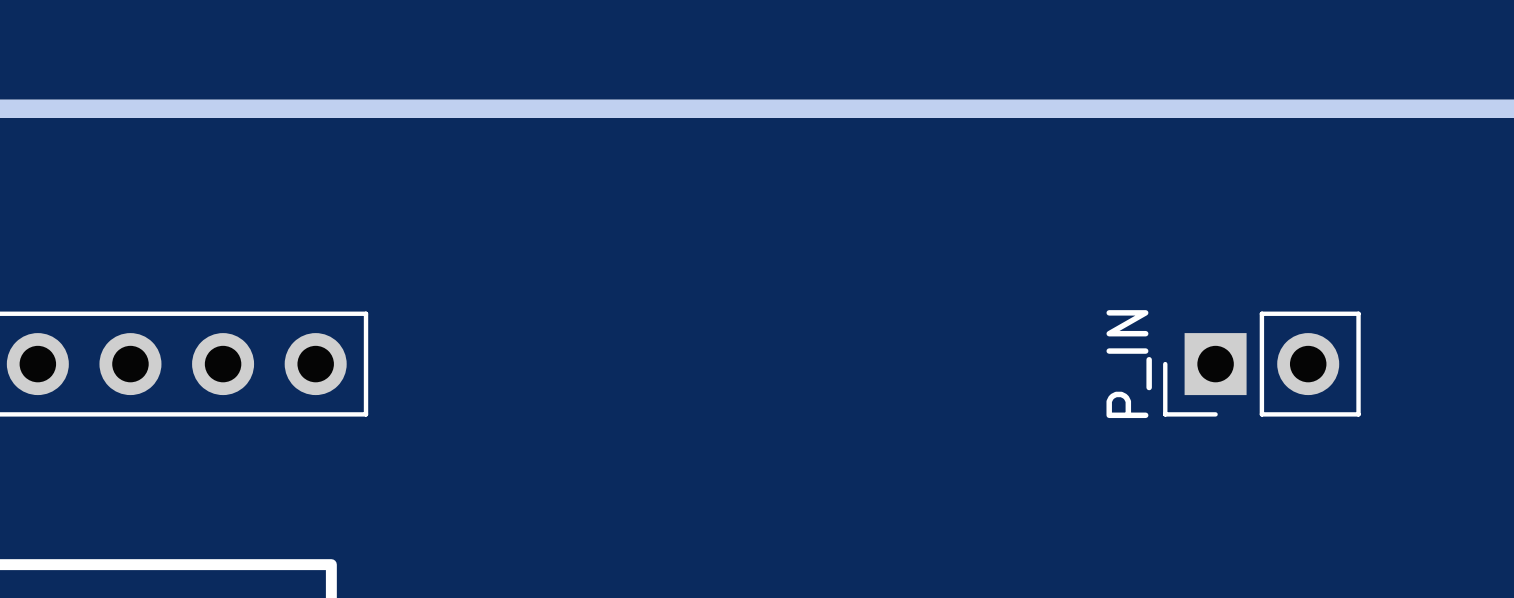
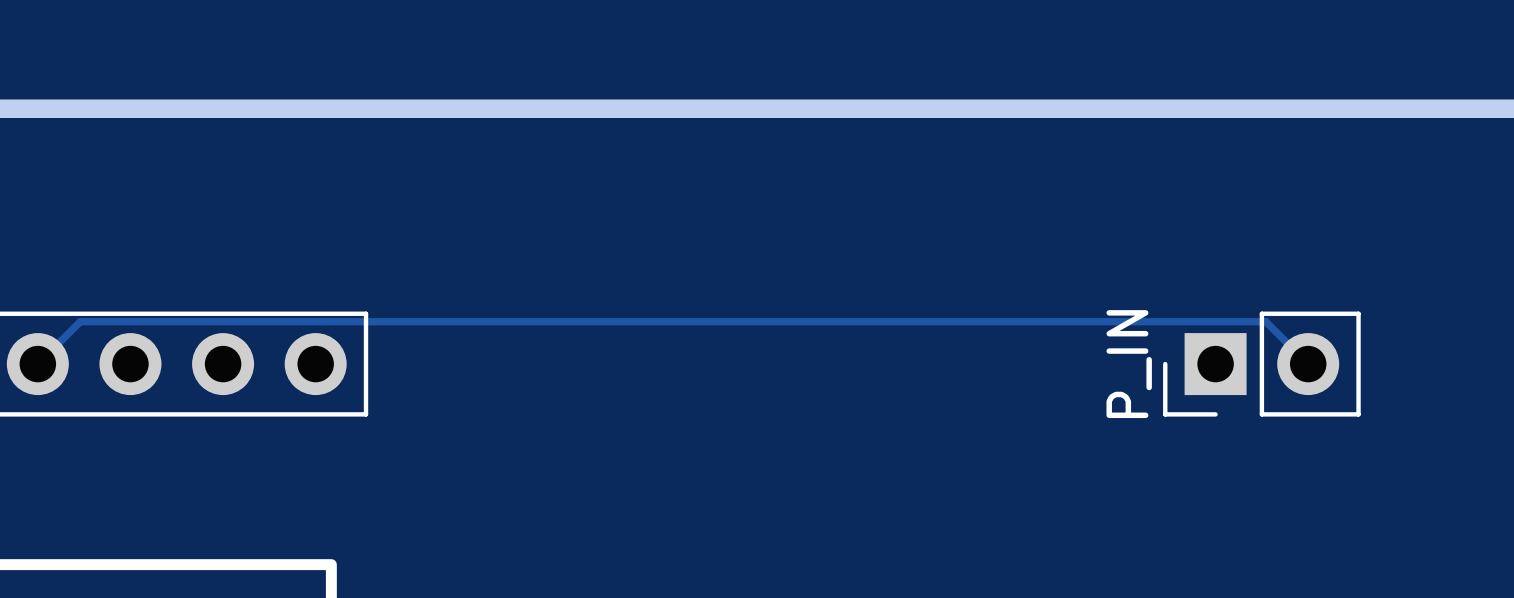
track: none -> (37, 364) (80, 321) (1265, 321) (1308, 364)

